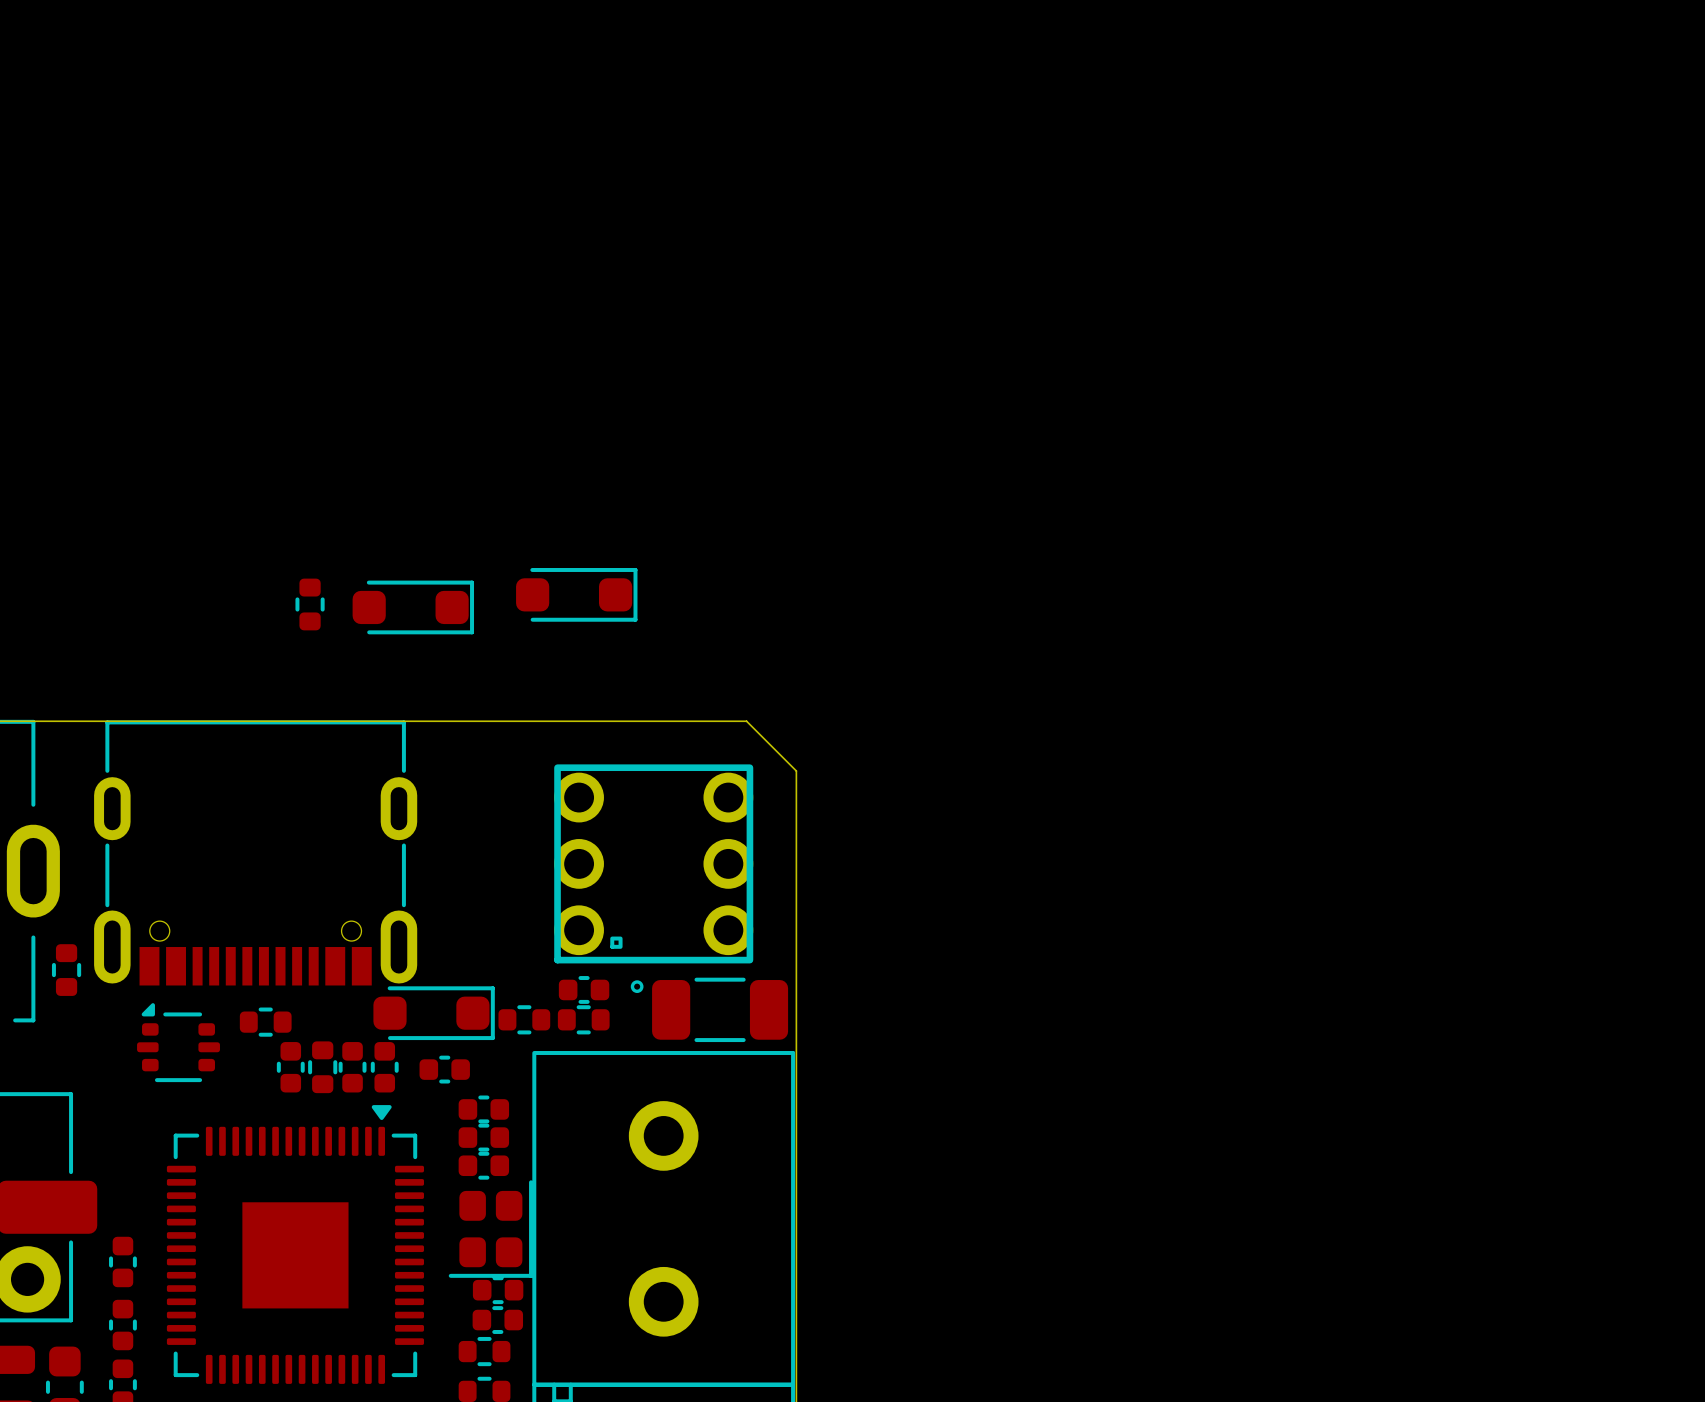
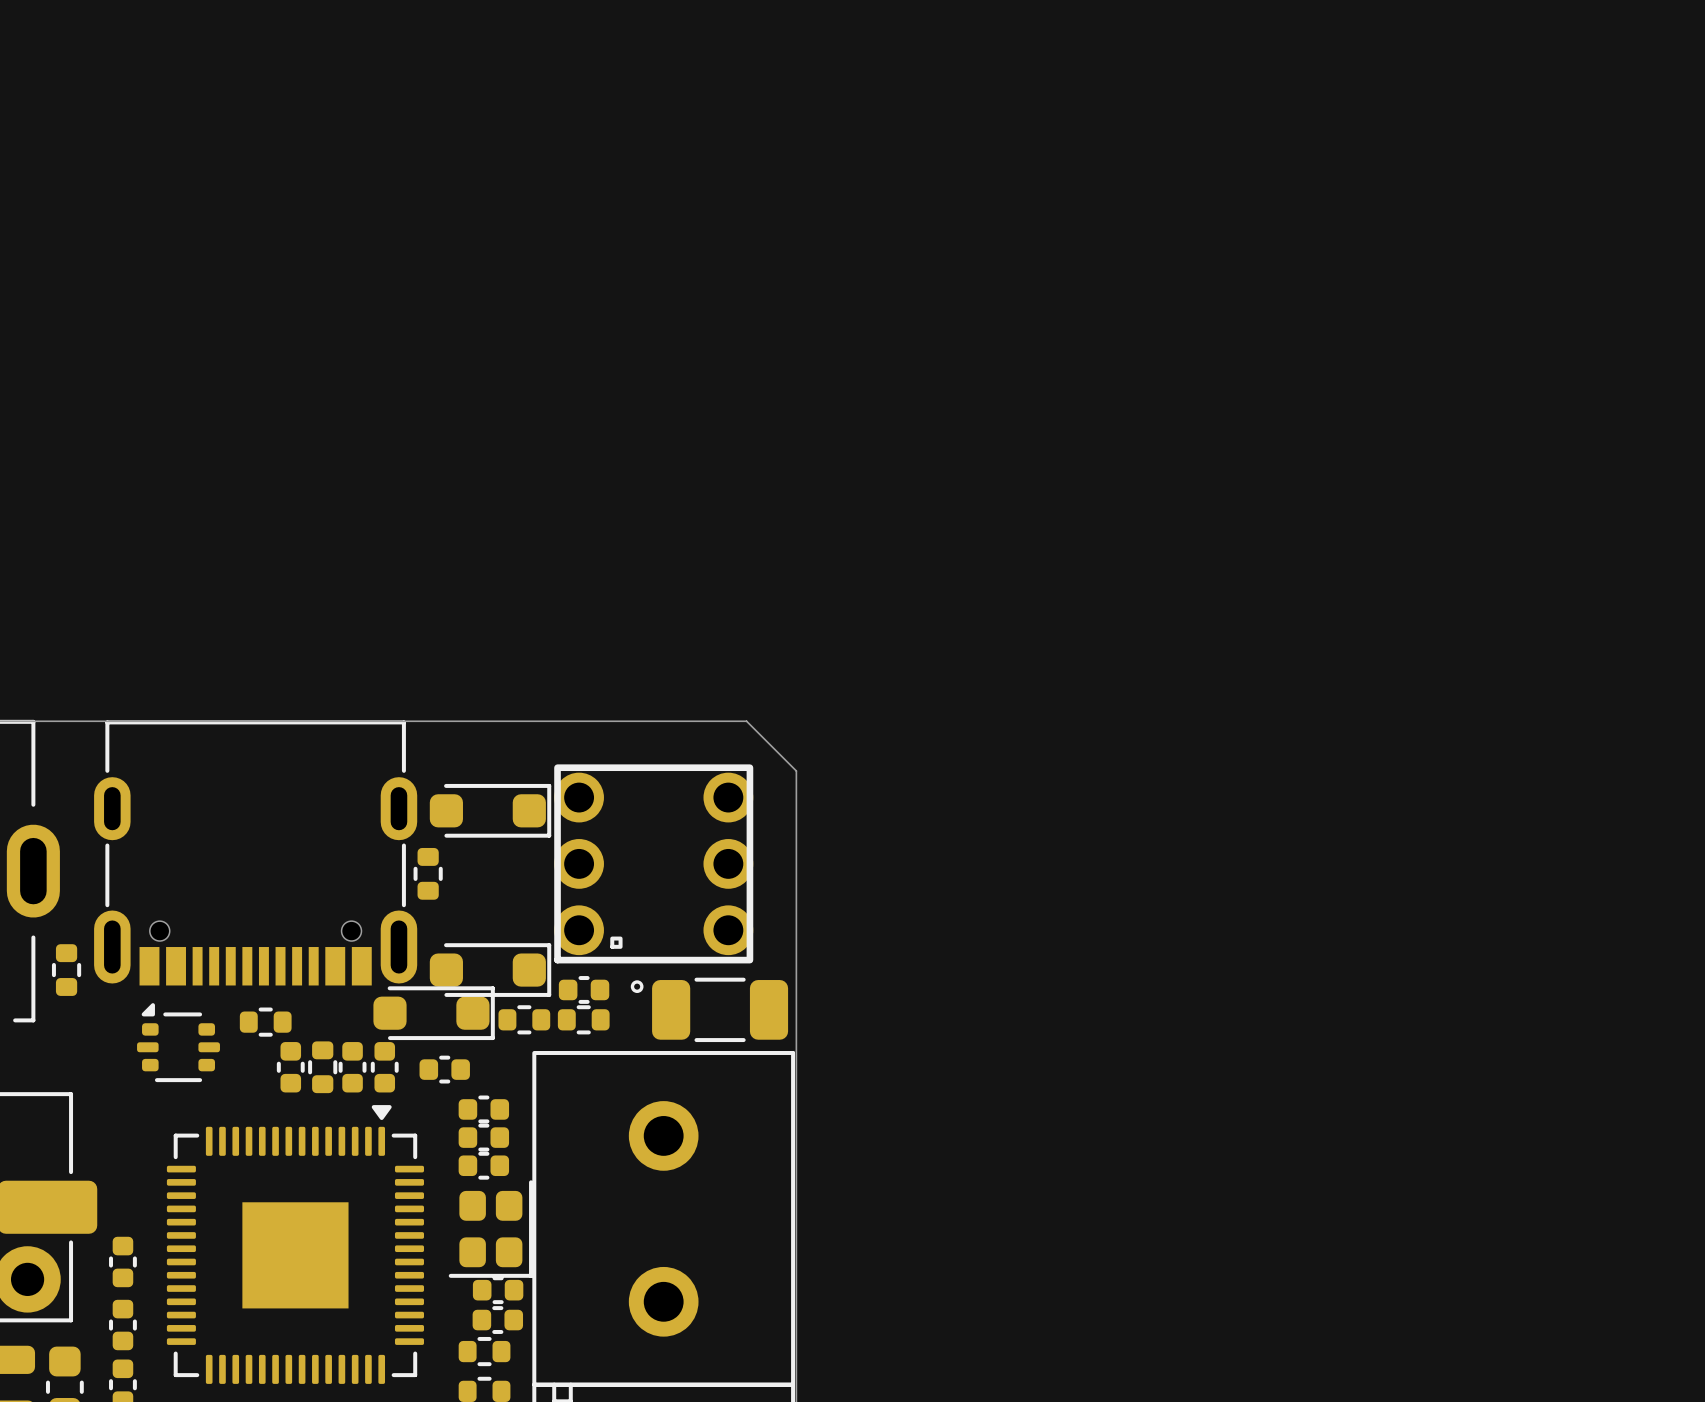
part: (576, 594) -> none
part position: (310, 604) -> (428, 873)
part: (413, 607) -> none
part: none -> (490, 810)
part: none -> (490, 970)

